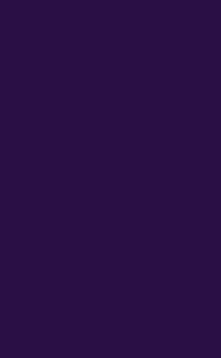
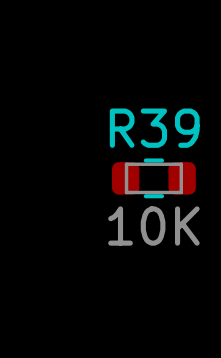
R39: none -> 10K (153, 178)

